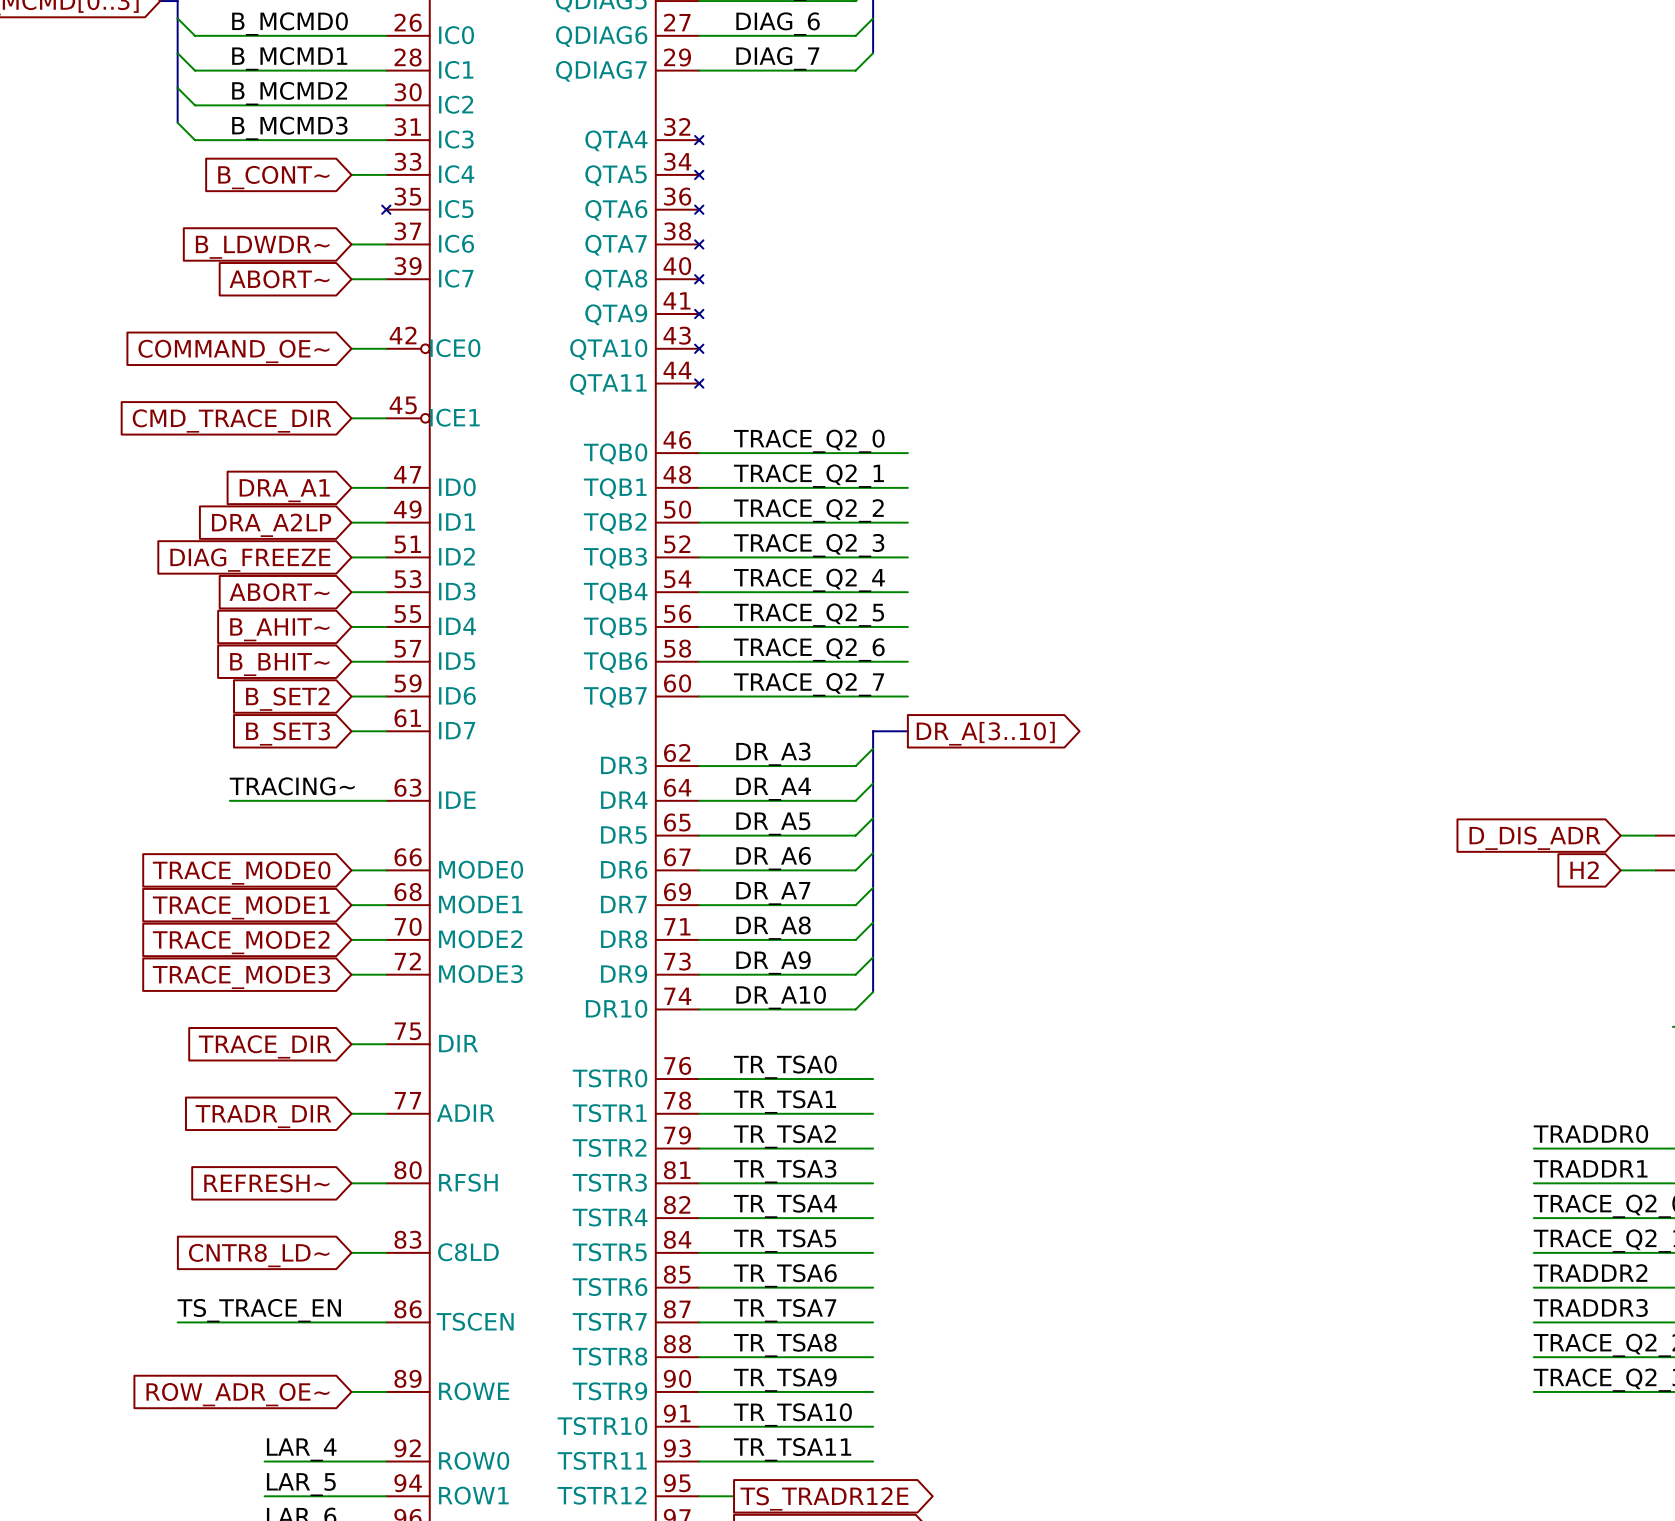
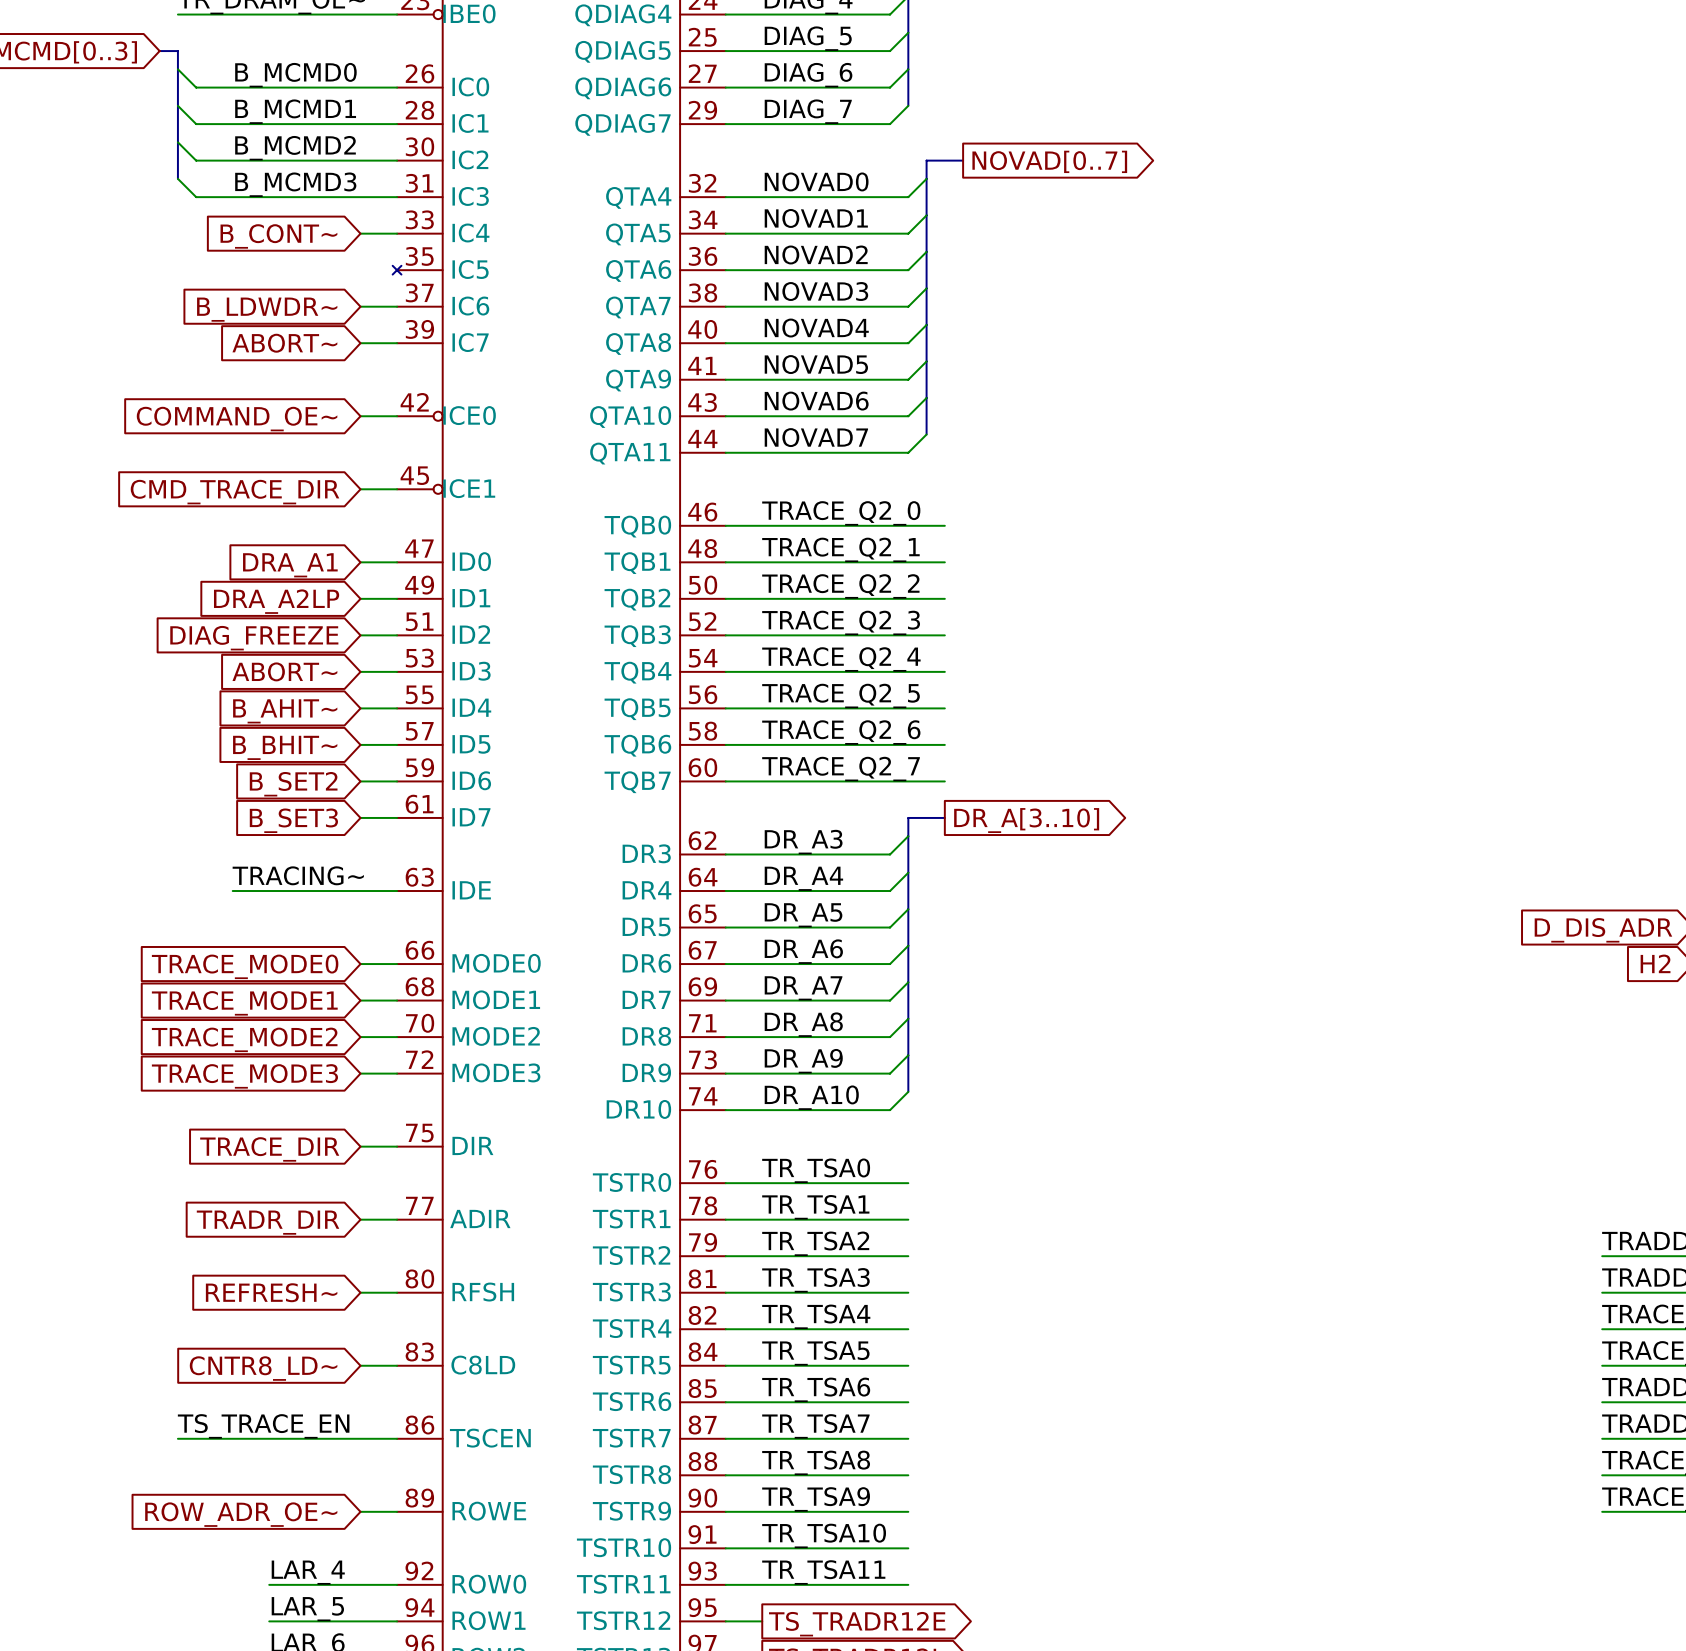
bus: none -> (963, 160) (926, 160) (926, 434)
global label: none -> NOVAD[0..7] (1049, 161)
wire: none -> (926, 178) (908, 197) (725, 197)
label: none -> NOVAD0 (816, 181)
no-connect mark: (699, 140) -> none
wire: none -> (926, 215) (908, 233) (725, 233)
label: none -> NOVAD1 (816, 218)
no-connect mark: (699, 174) -> none
wire: none -> (926, 251) (908, 270) (725, 270)
label: none -> NOVAD2 (816, 254)
no-connect mark: (699, 209) -> none
wire: none -> (926, 288) (908, 306) (725, 306)
label: none -> NOVAD3 (816, 291)
no-connect mark: (699, 244) -> none
wire: none -> (926, 324) (908, 343) (725, 343)
label: none -> NOVAD4 (816, 328)
no-connect mark: (699, 279) -> none
wire: none -> (926, 361) (908, 379) (725, 379)
label: none -> NOVAD5 (816, 364)
no-connect mark: (699, 314) -> none
wire: none -> (926, 397) (908, 416) (725, 416)
label: none -> NOVAD6 (816, 401)
no-connect mark: (699, 348) -> none
wire: none -> (926, 434) (908, 452) (725, 452)
label: none -> NOVAD7 (816, 437)
no-connect mark: (699, 383) -> none

